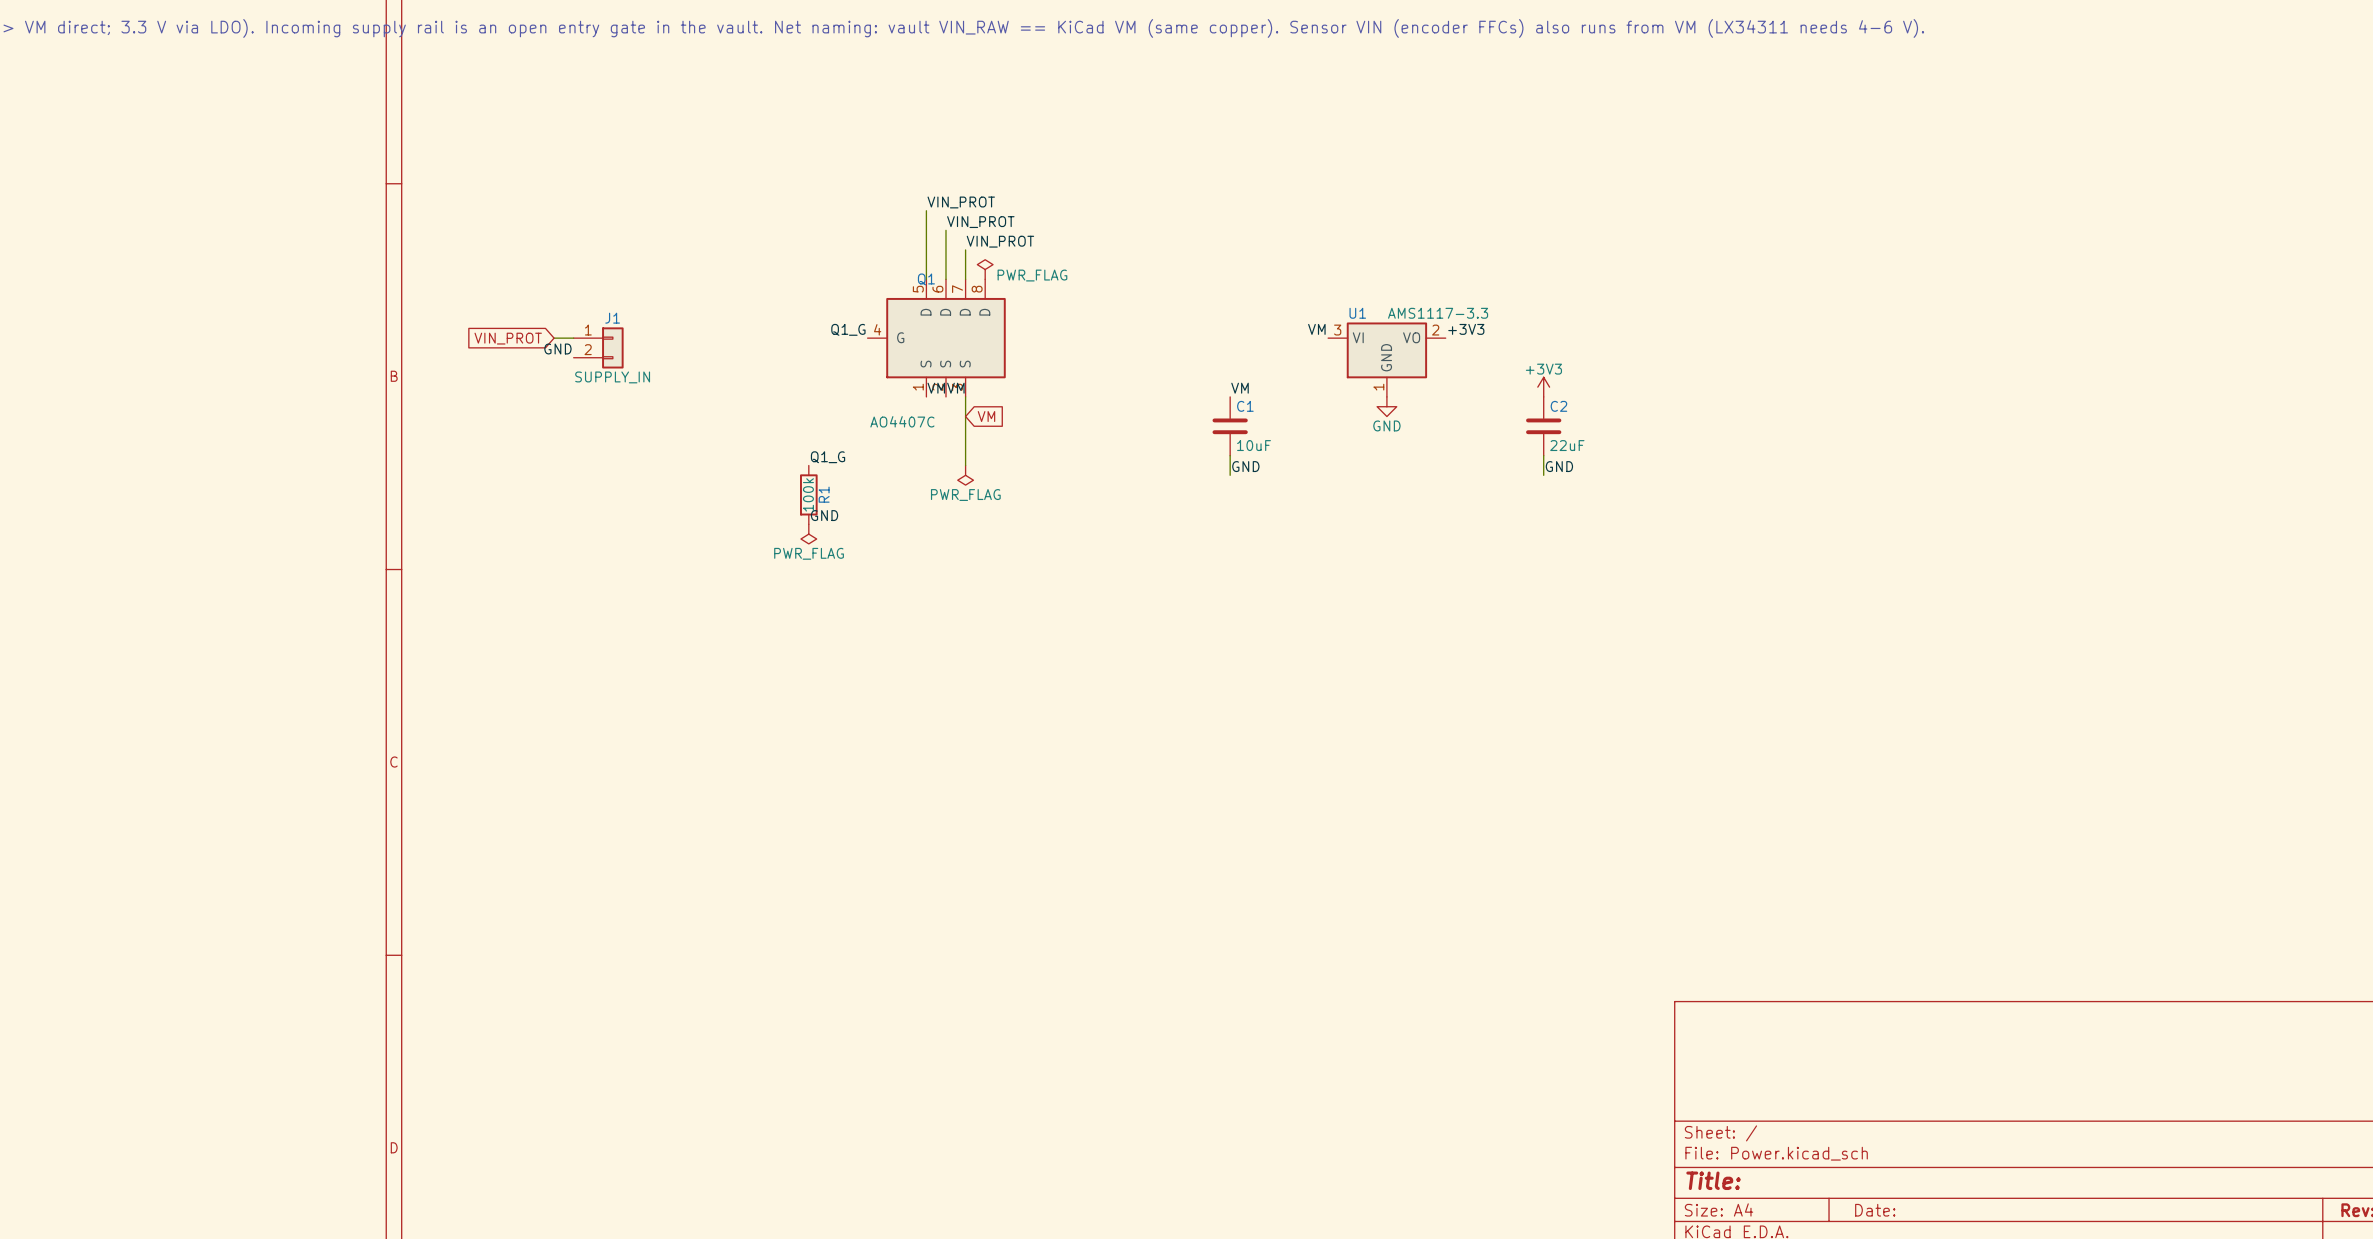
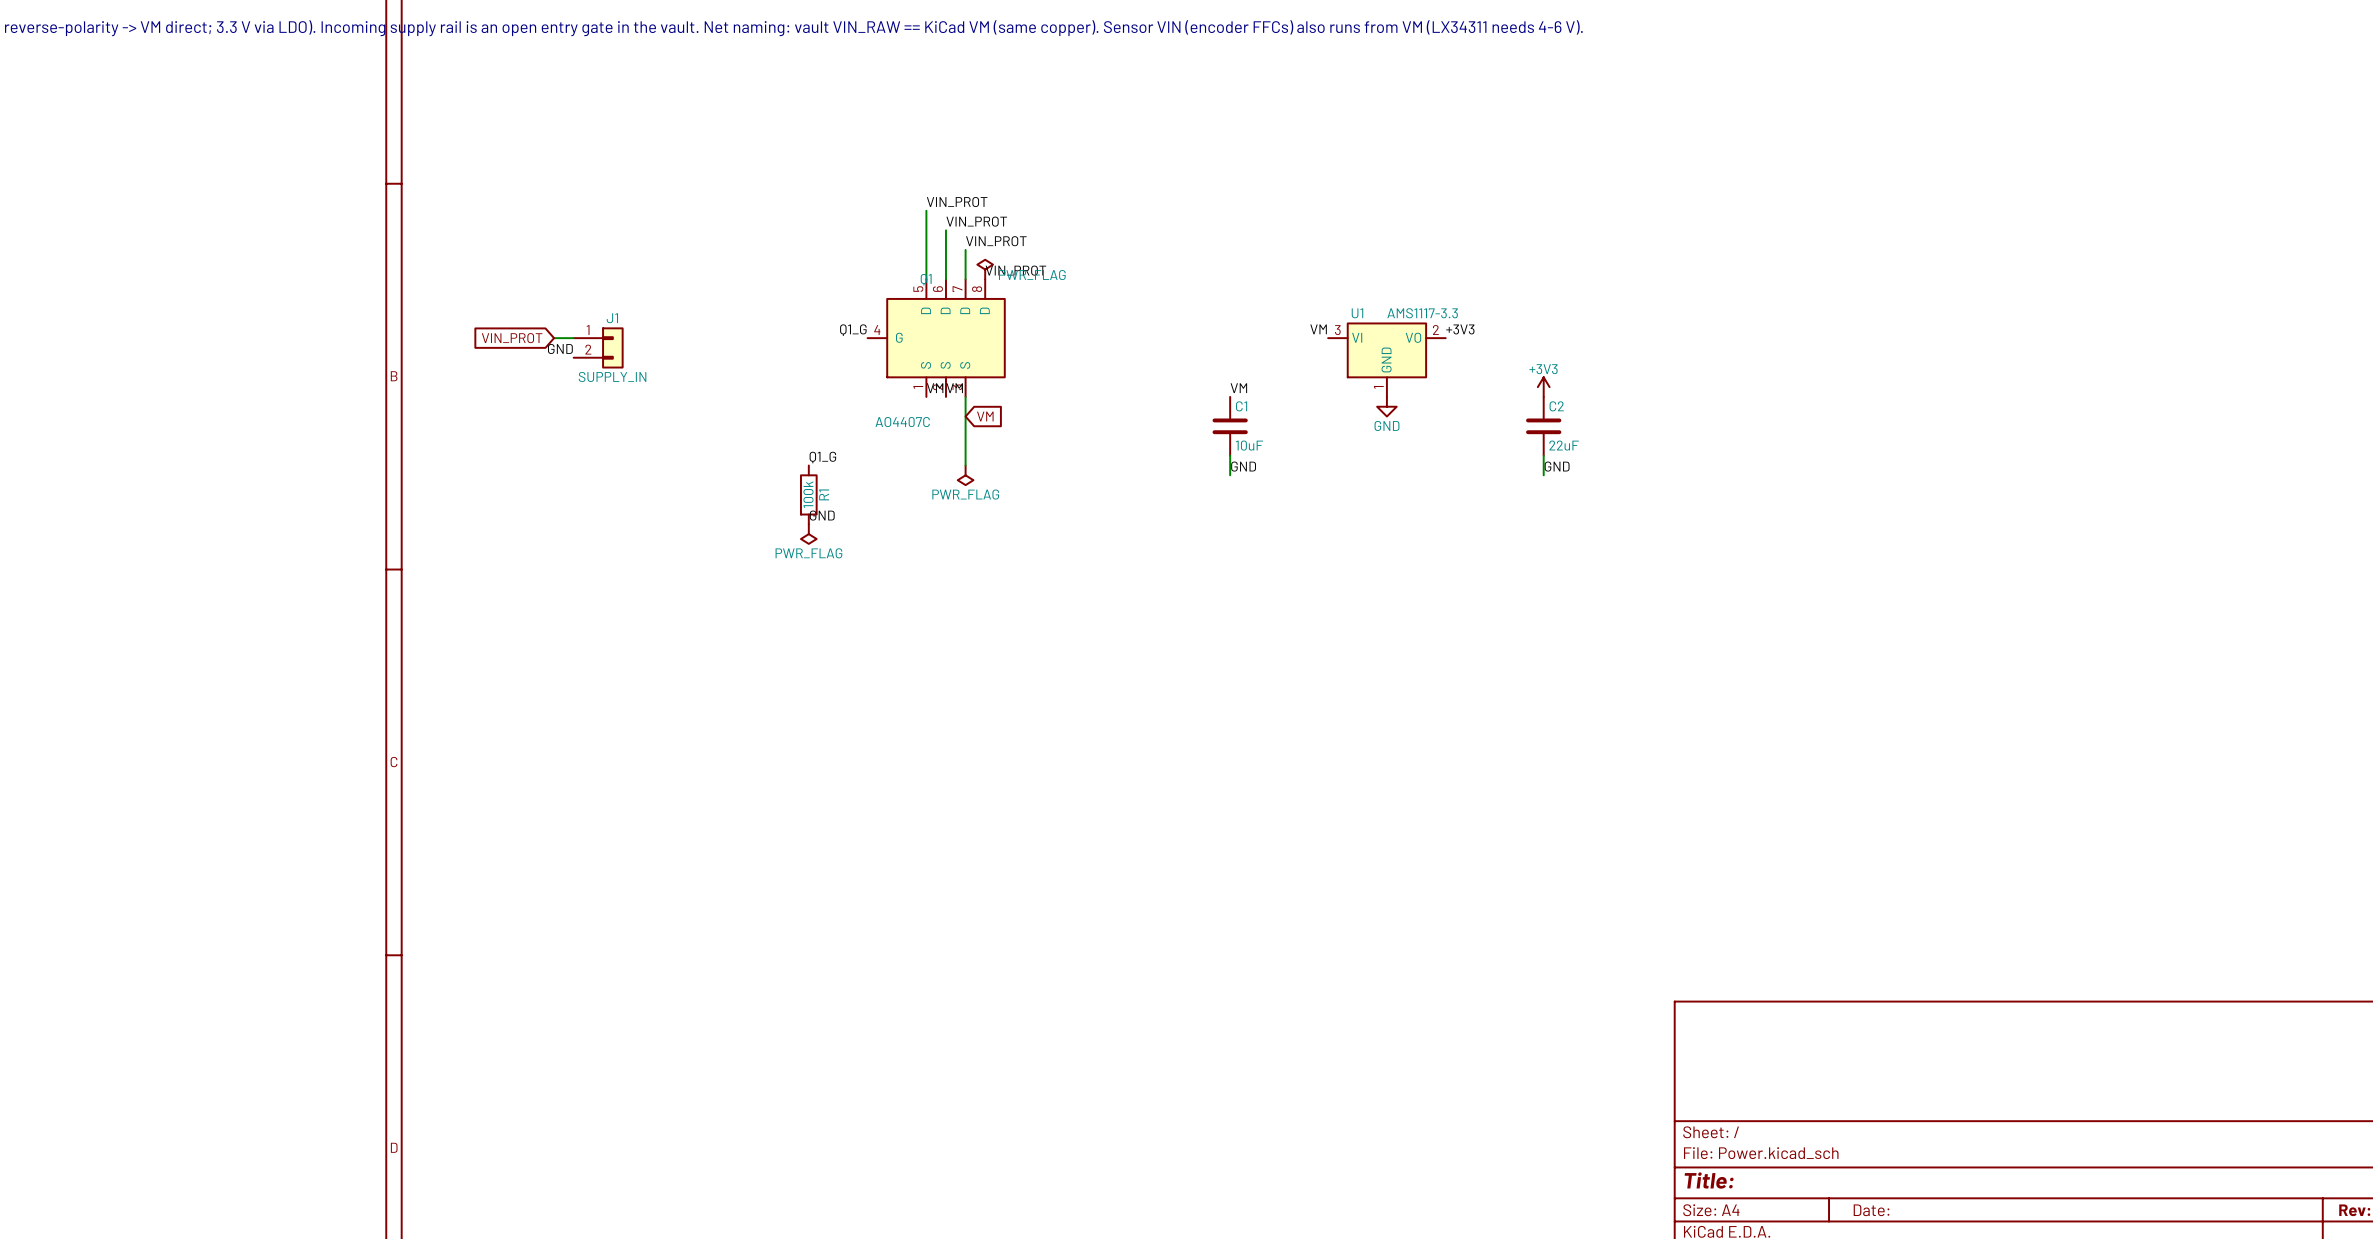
label: none -> VIN_PROT (1015, 270)

